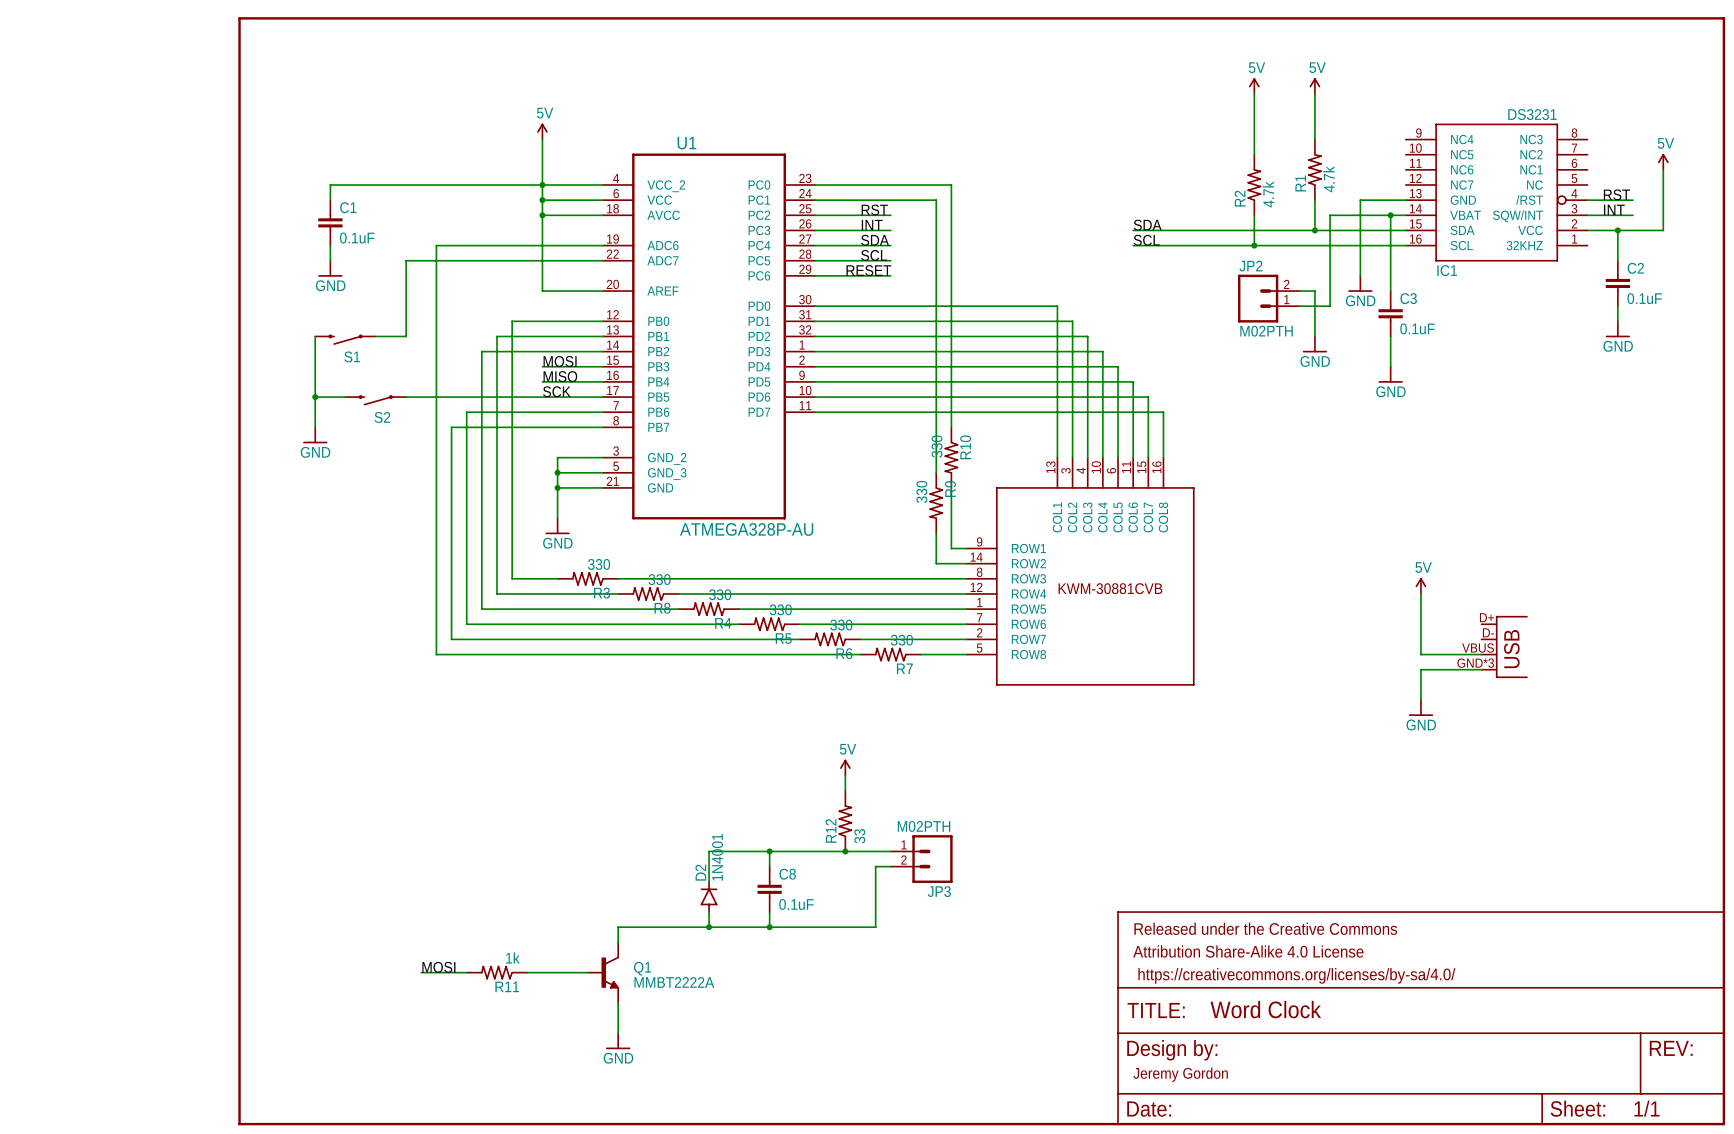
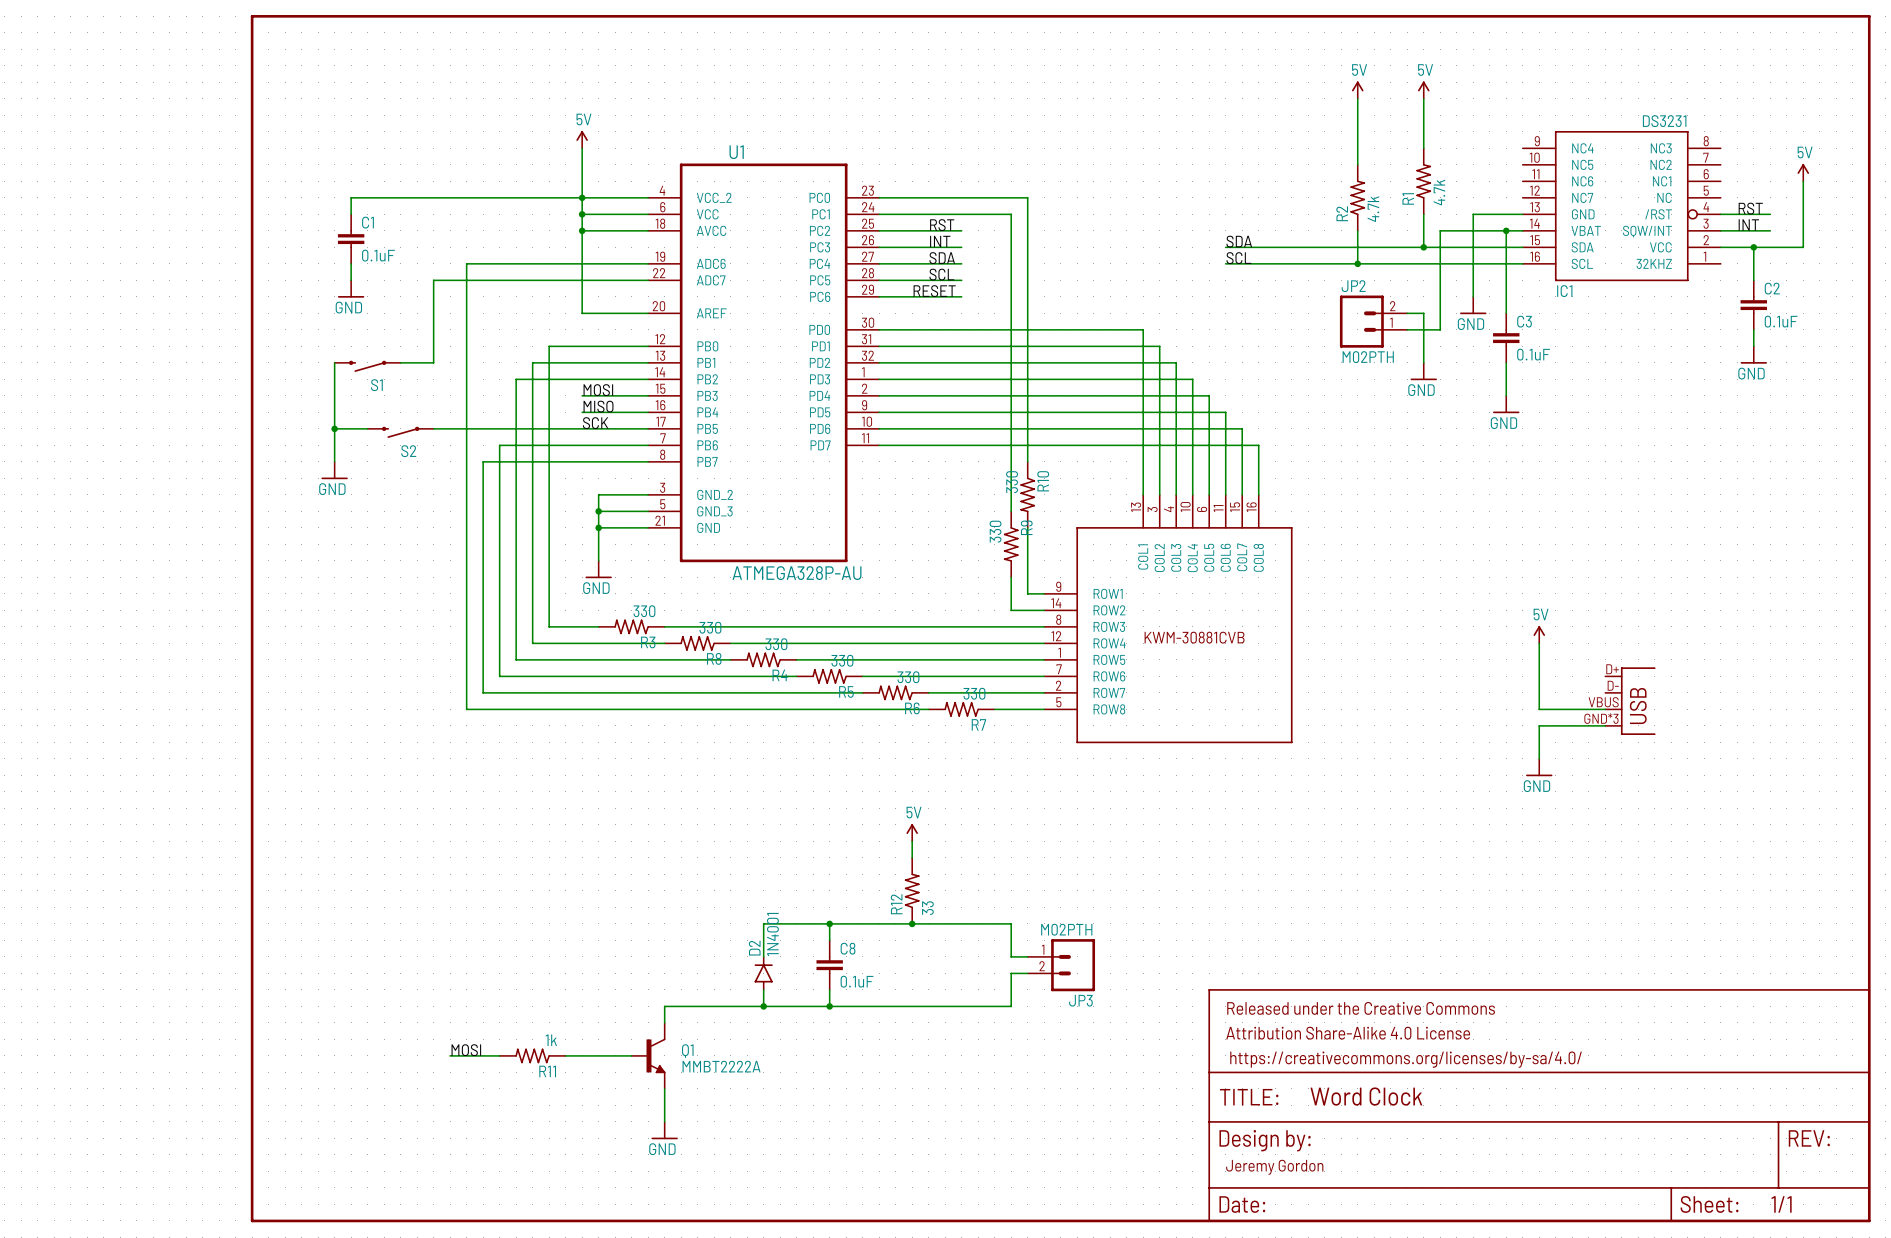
wire: none -> (961, 923) (1011, 923) (1011, 956) (1027, 956)
JP3 position: (921, 859) -> (1061, 965)
wire: (890, 866) (875, 866) (875, 927) -> (1027, 973) (1011, 973) (1011, 1006) (945, 1006)

